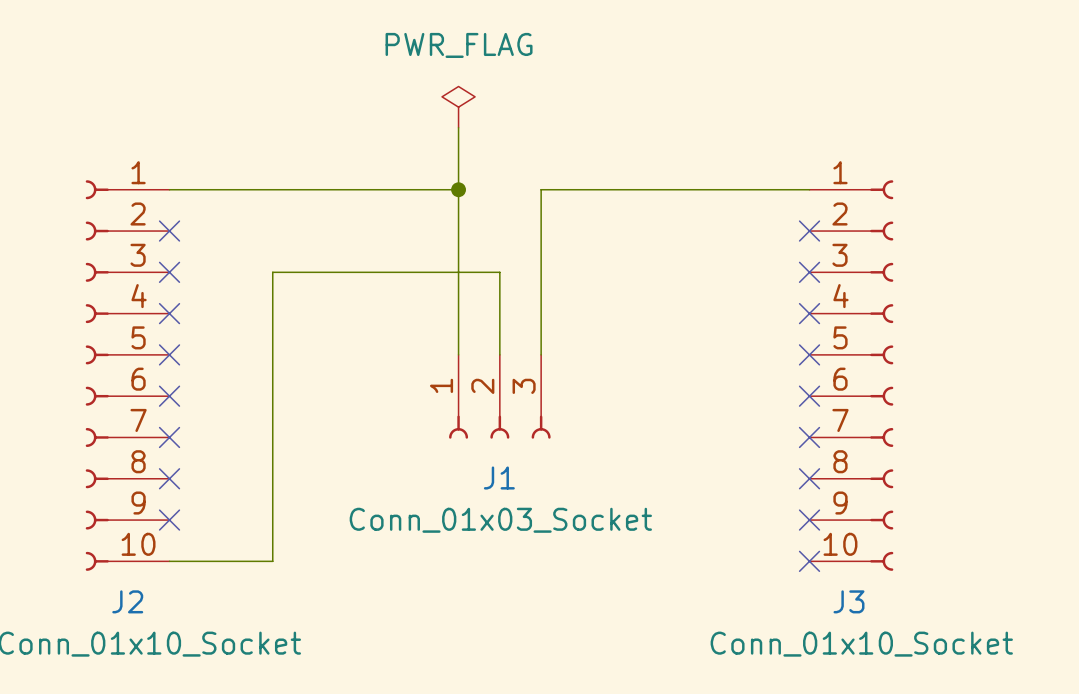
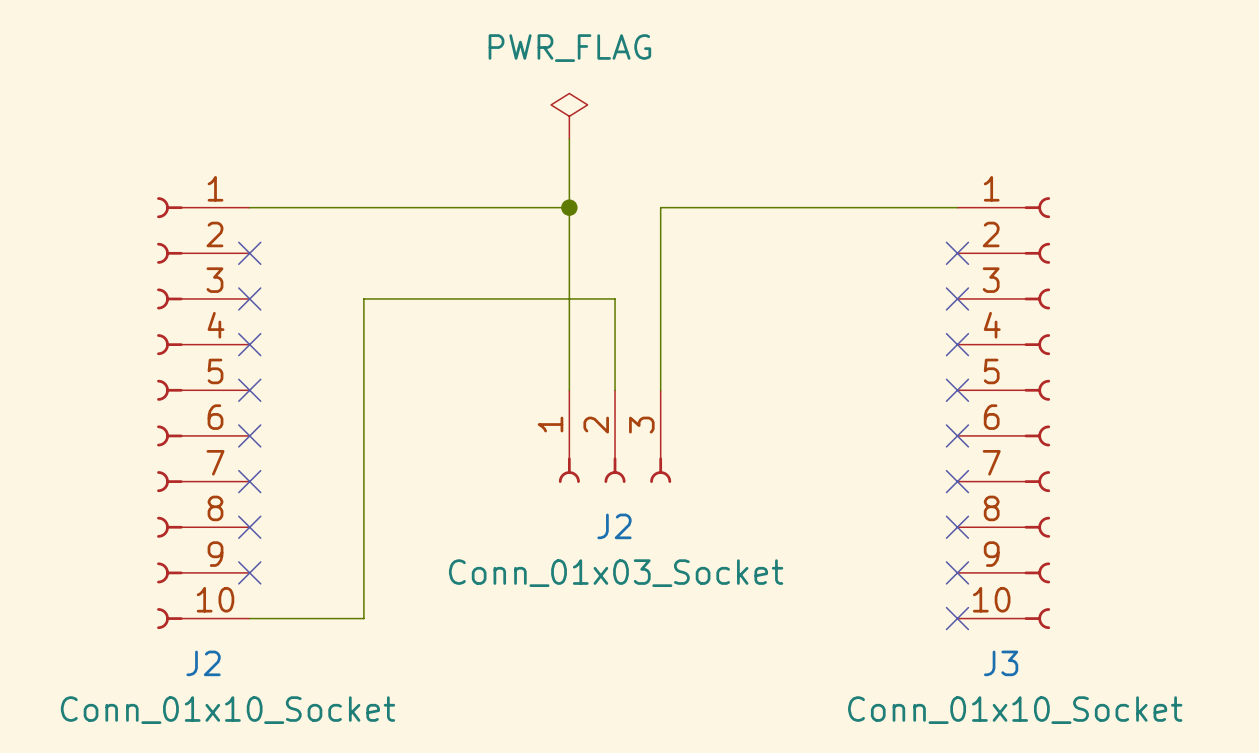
J1 name: J1 (499, 477) -> J2 (614, 526)

